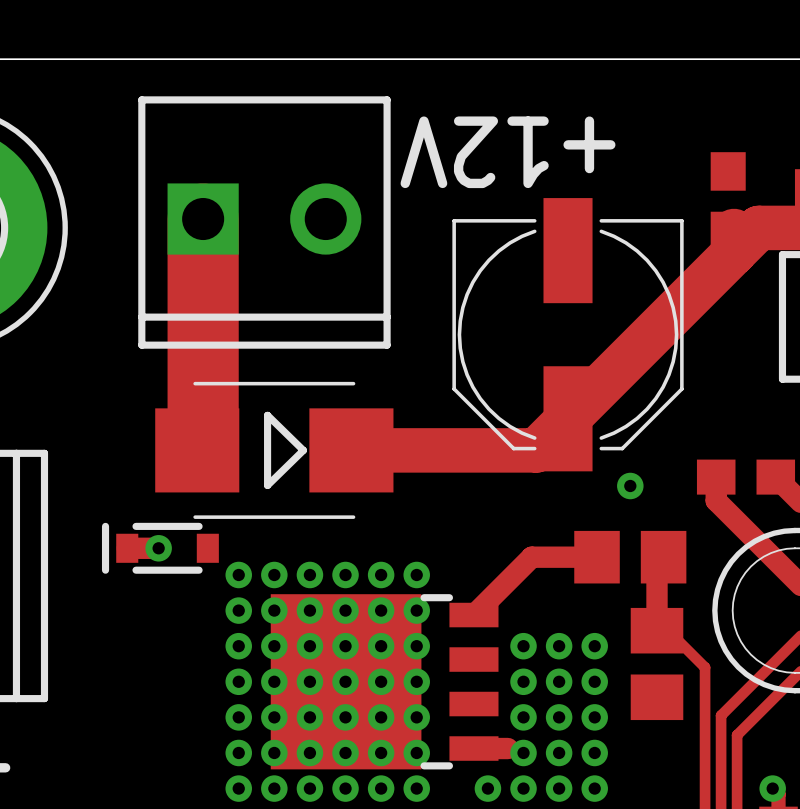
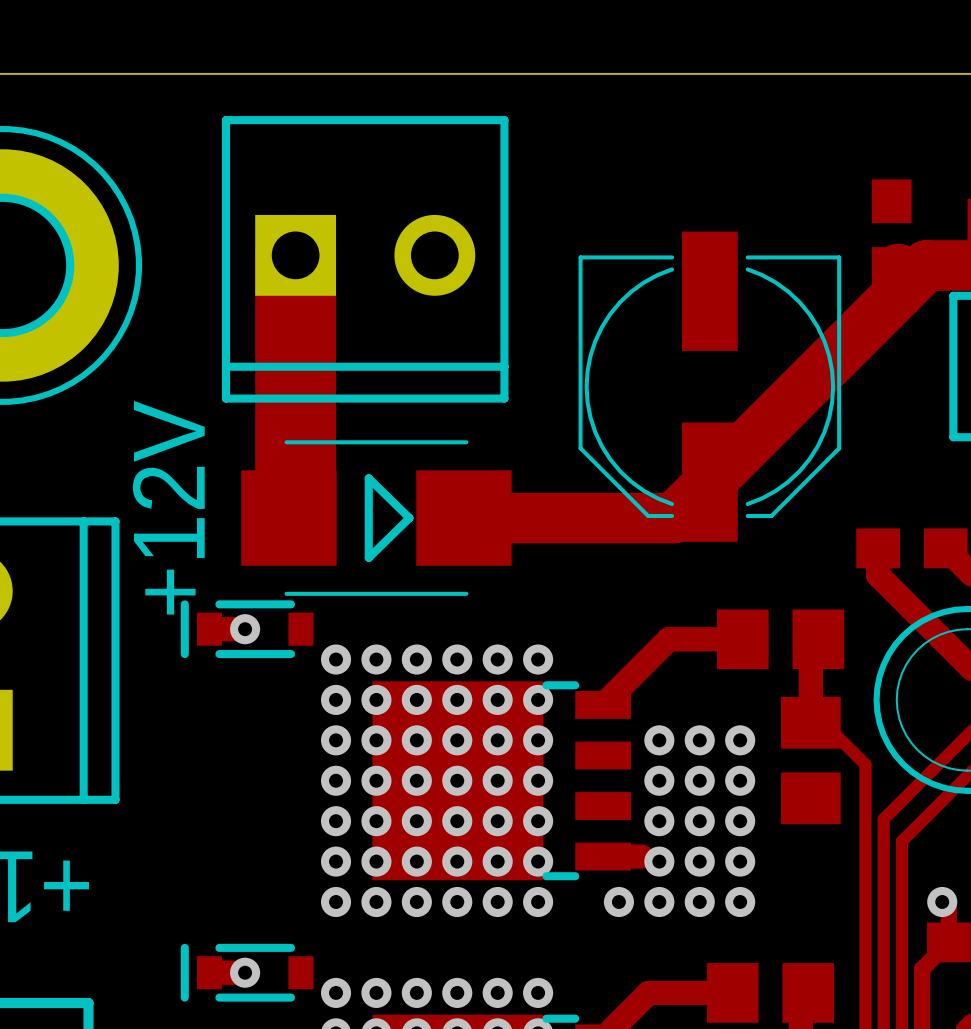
text rotation: 0° (508, 152) -> 90° clockwise (168, 507)
text position: +12V (508, 152) -> +12V (168, 507)
via: (630, 485) -> none

